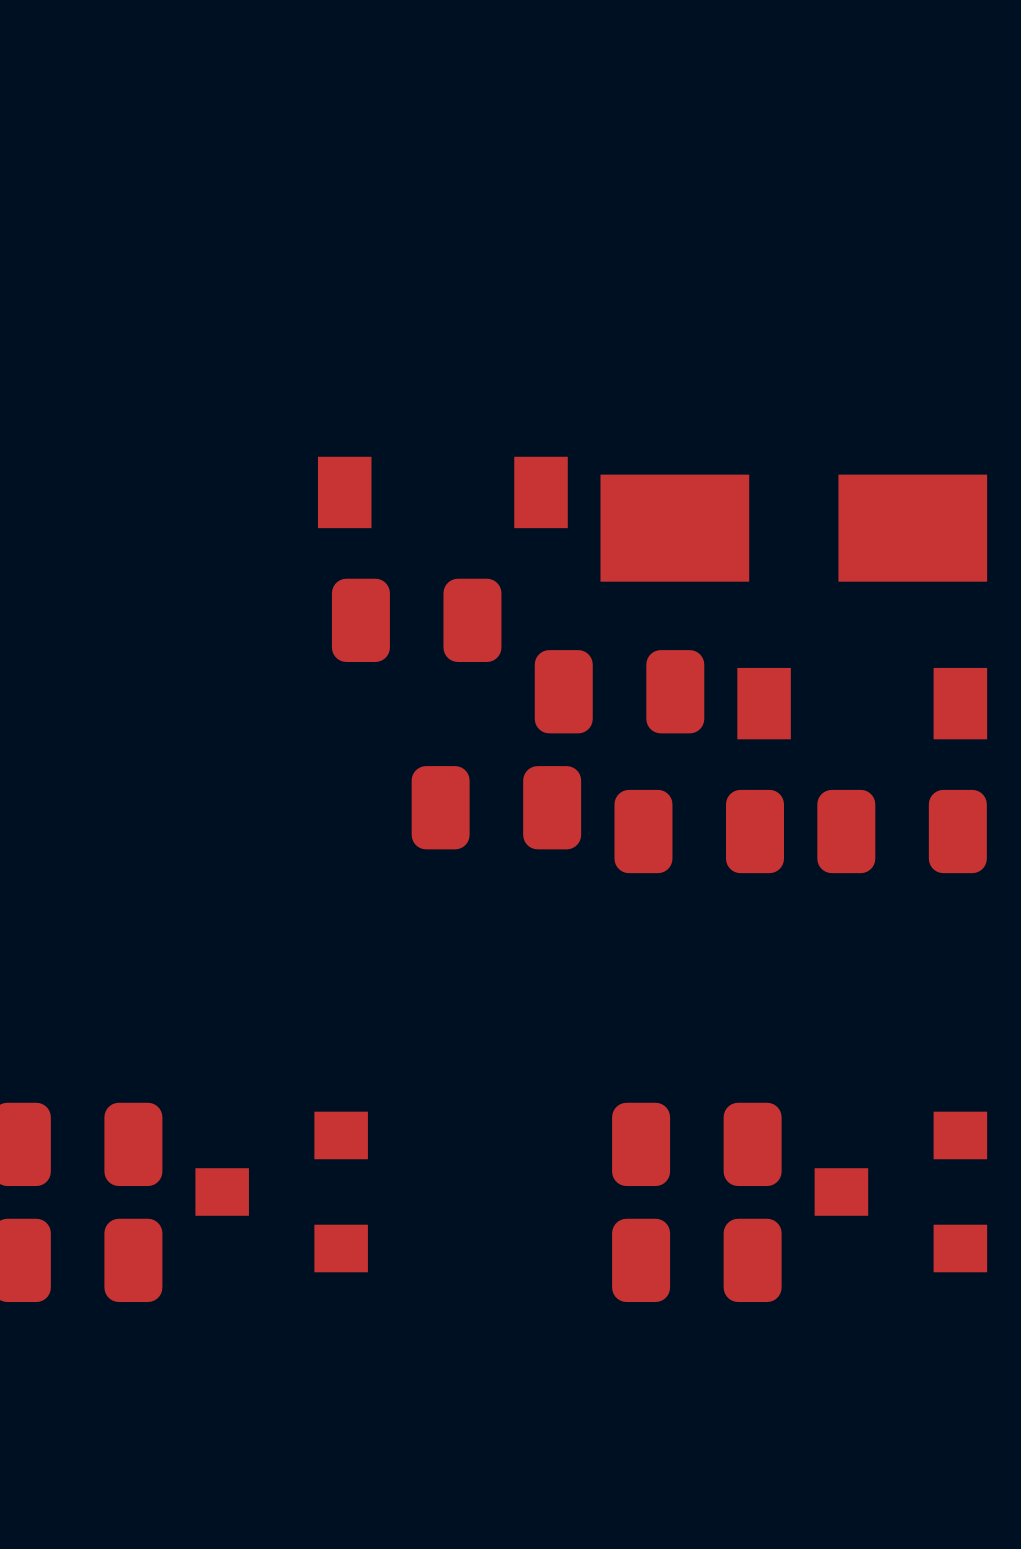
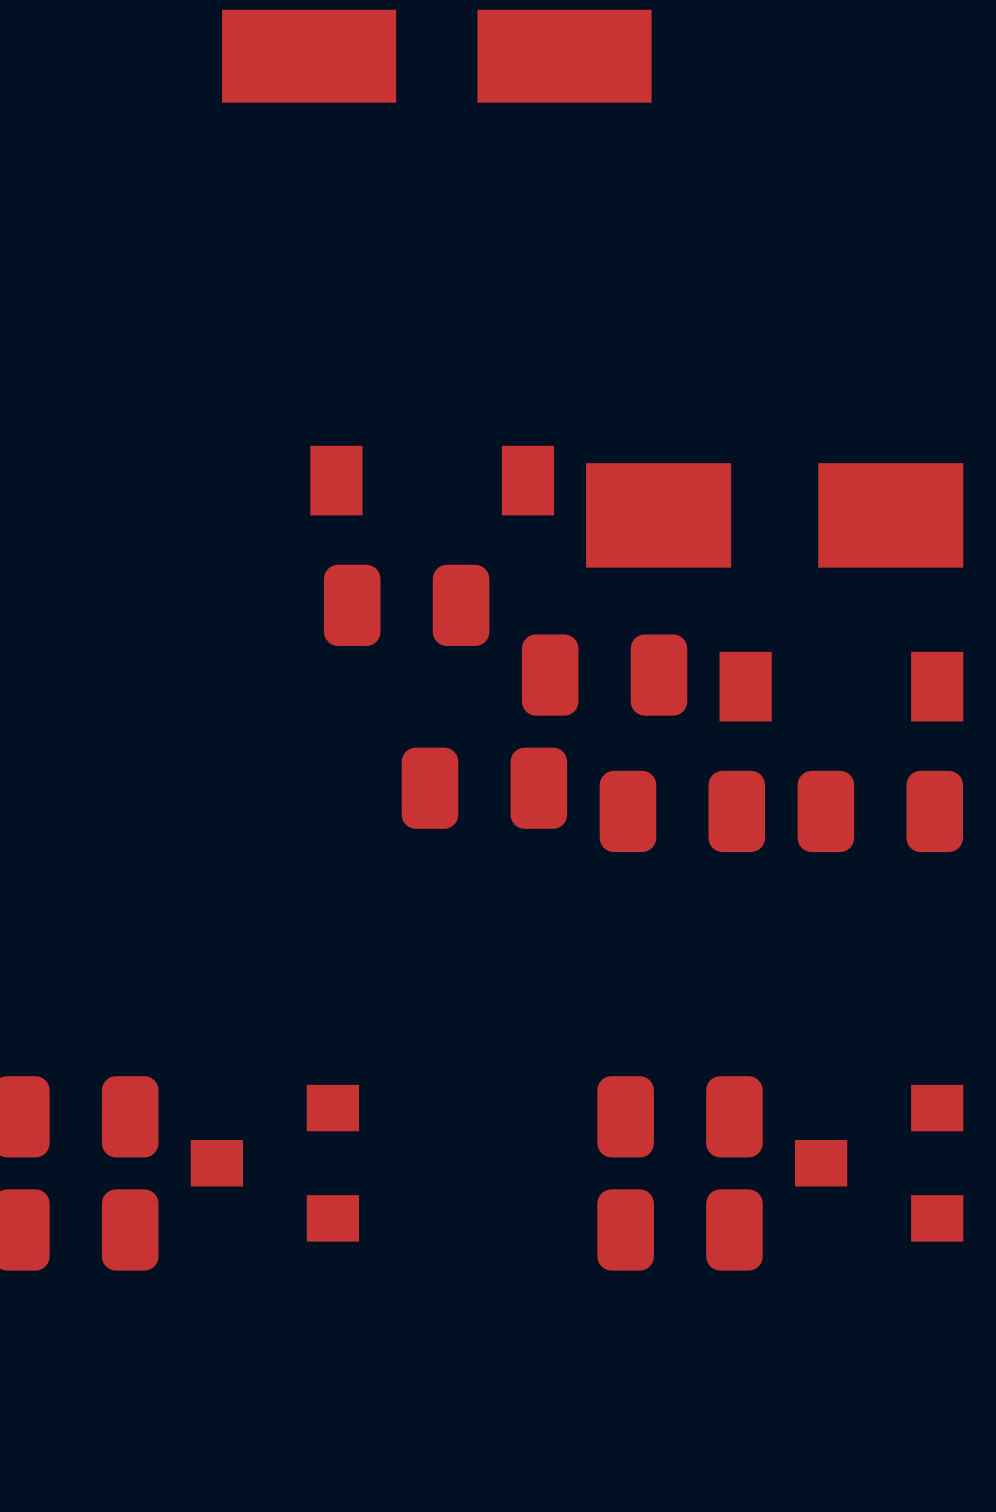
part: none -> (436, 56)

